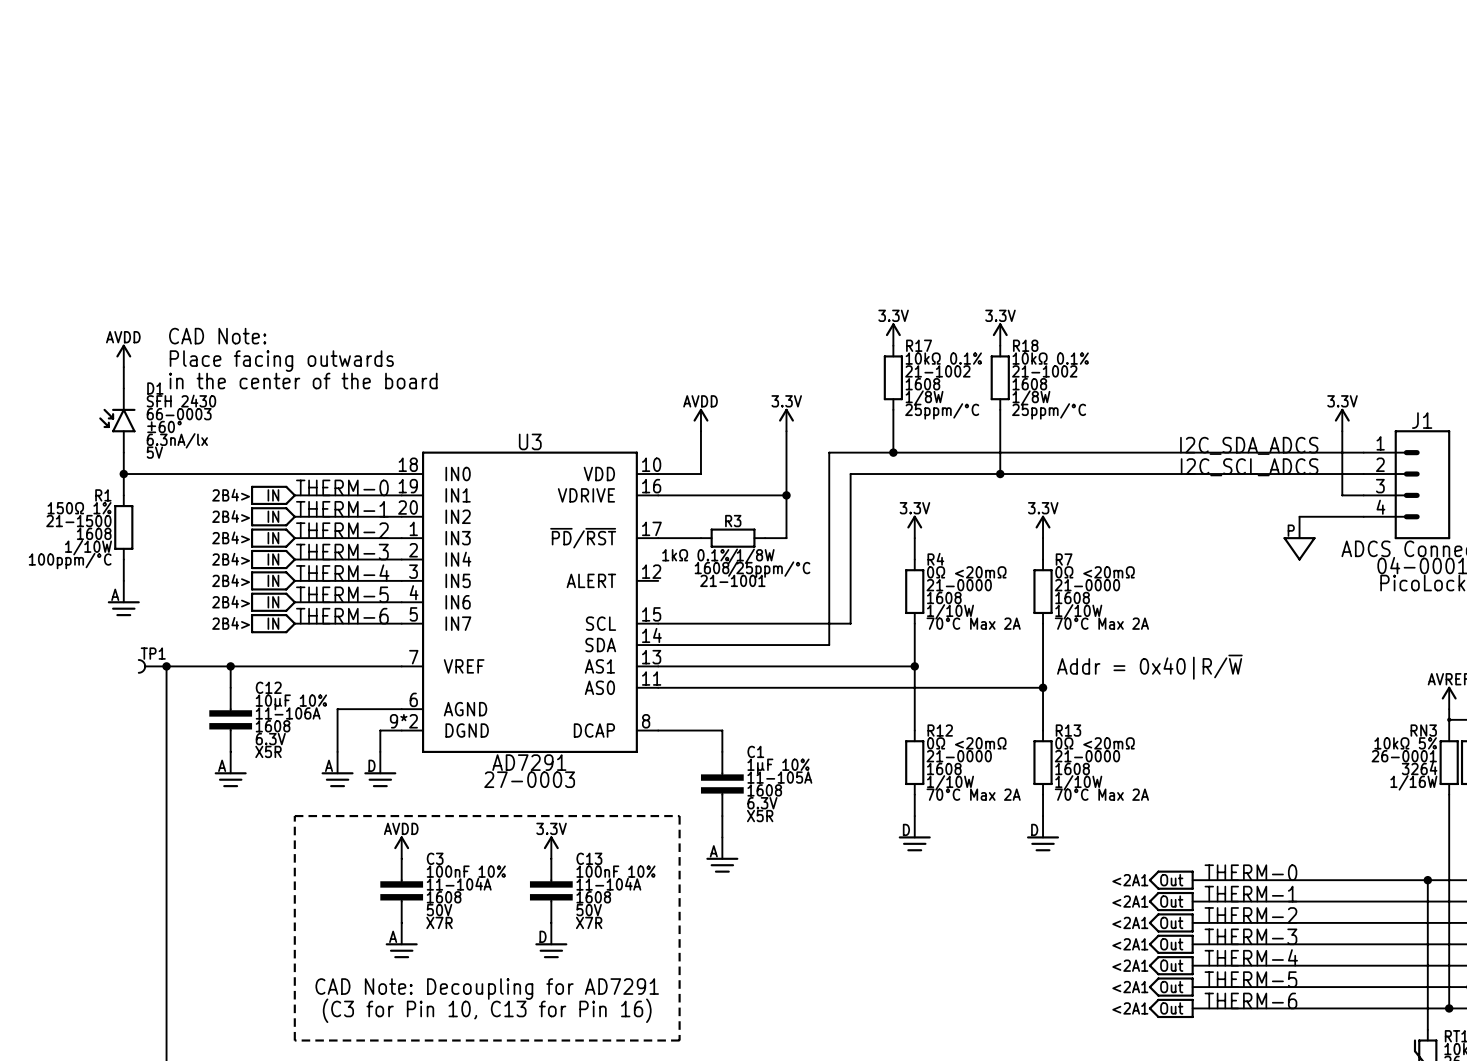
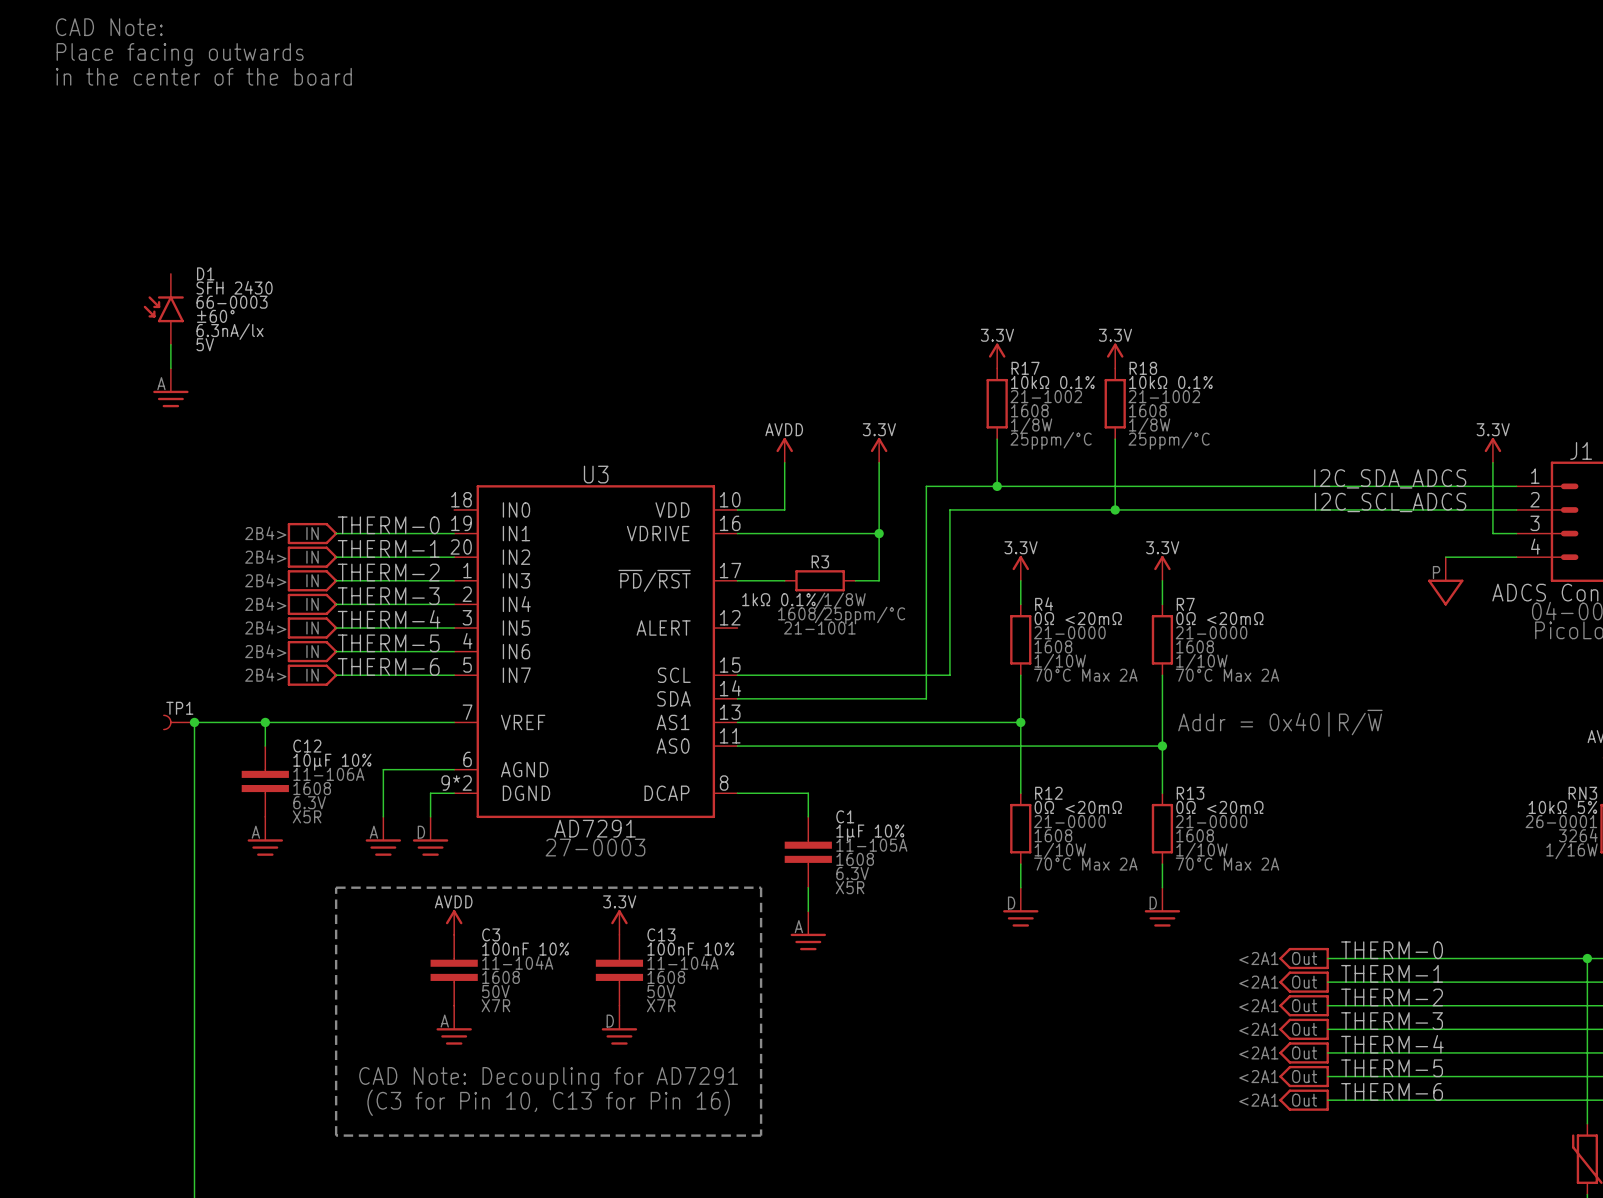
text: none -> CAD Note: (109, 27)
text: none -> Place facing outwards (180, 54)
text: none -> in the center of the board (203, 76)
text: CAD Note: (217, 336) -> none
power symbol: AVDD (123, 355) -> none
text: Place facing outwards (281, 361) -> none
power symbol: none -> (170, 387)
wire: (123, 367) (123, 388) -> (170, 344) (170, 368)
text: in the center of the board (303, 381) -> none
D1 position: (117, 420) -> (163, 309)
wire: (123, 452) (123, 495) -> none
wire: (123, 474) (401, 474) -> none
junction: (123, 474) -> none
R1: 150Ω 1% (123, 527) -> none
wire: (123, 559) (123, 580) -> none
power symbol: (123, 598) -> none

